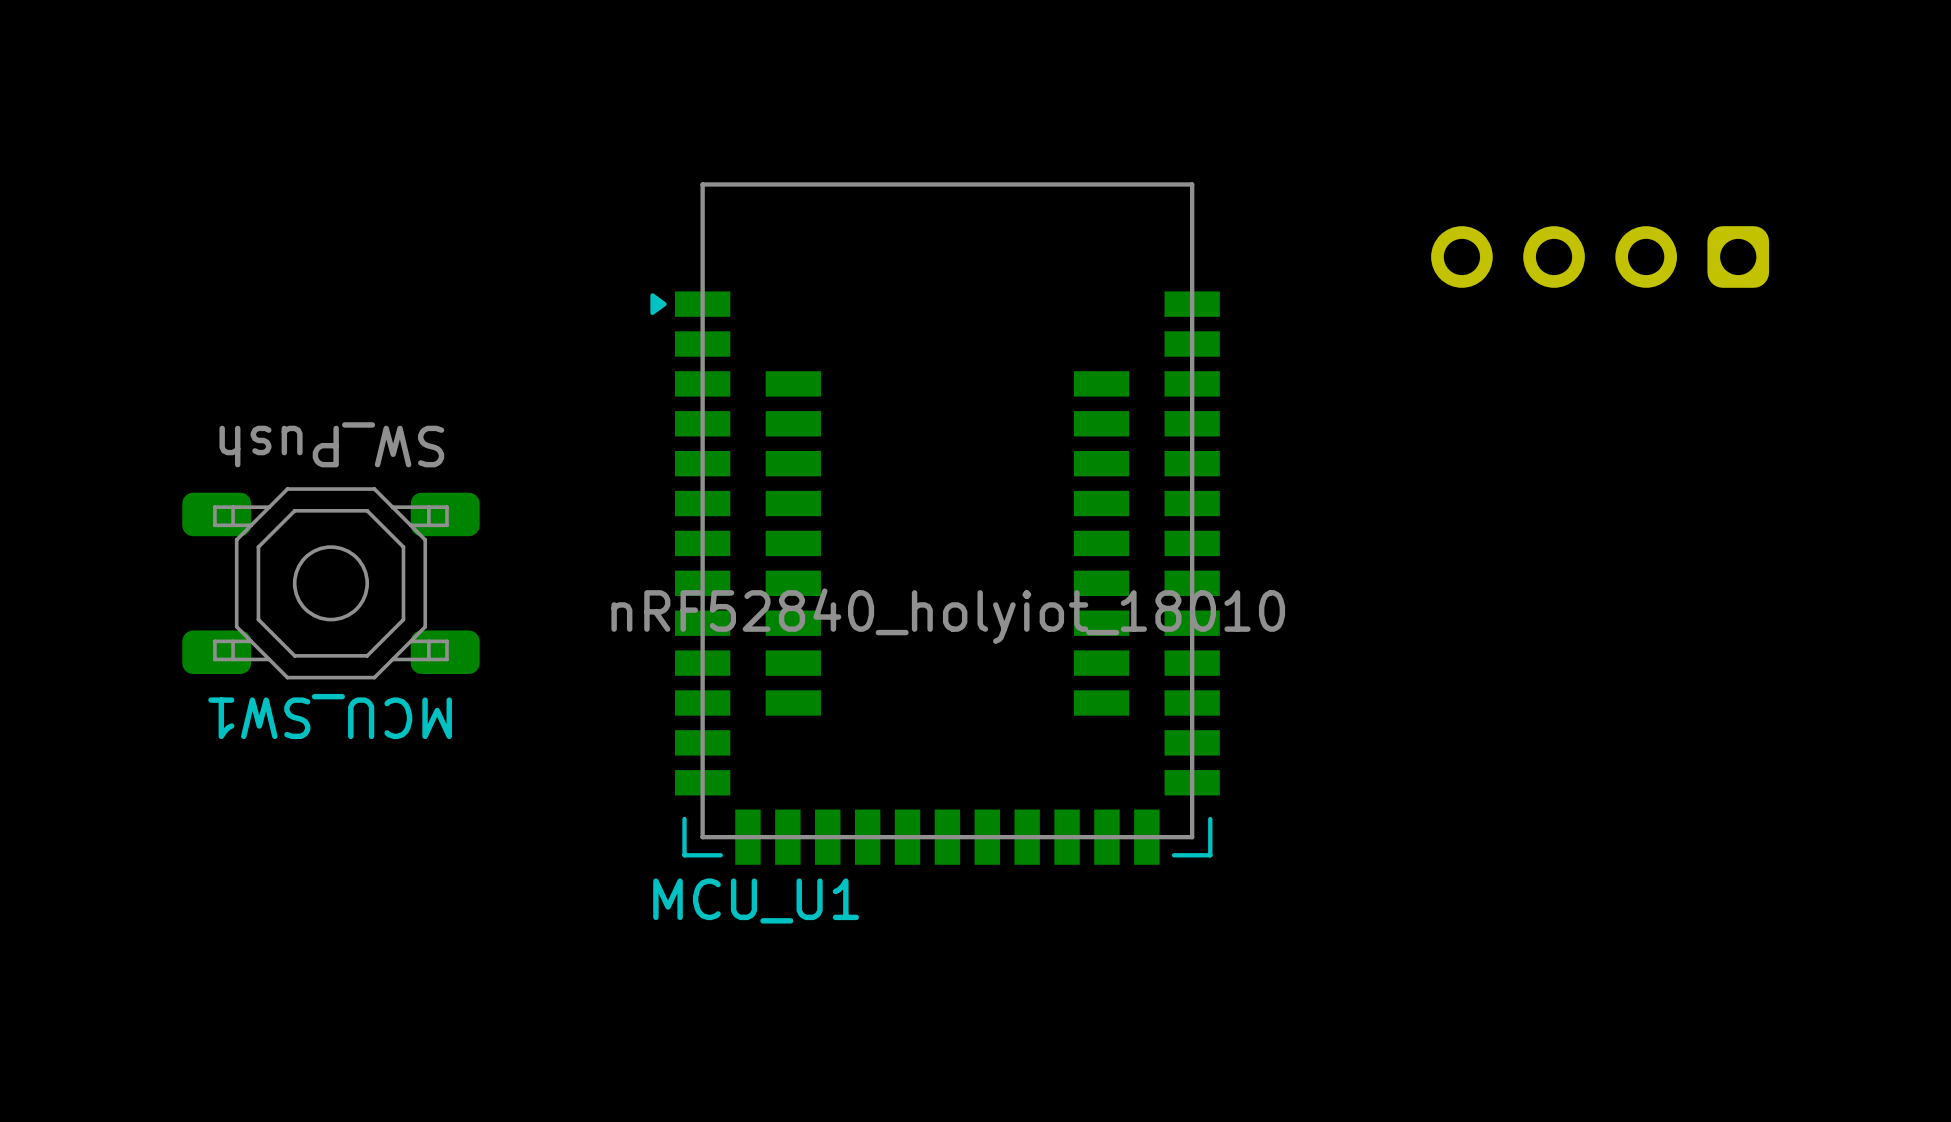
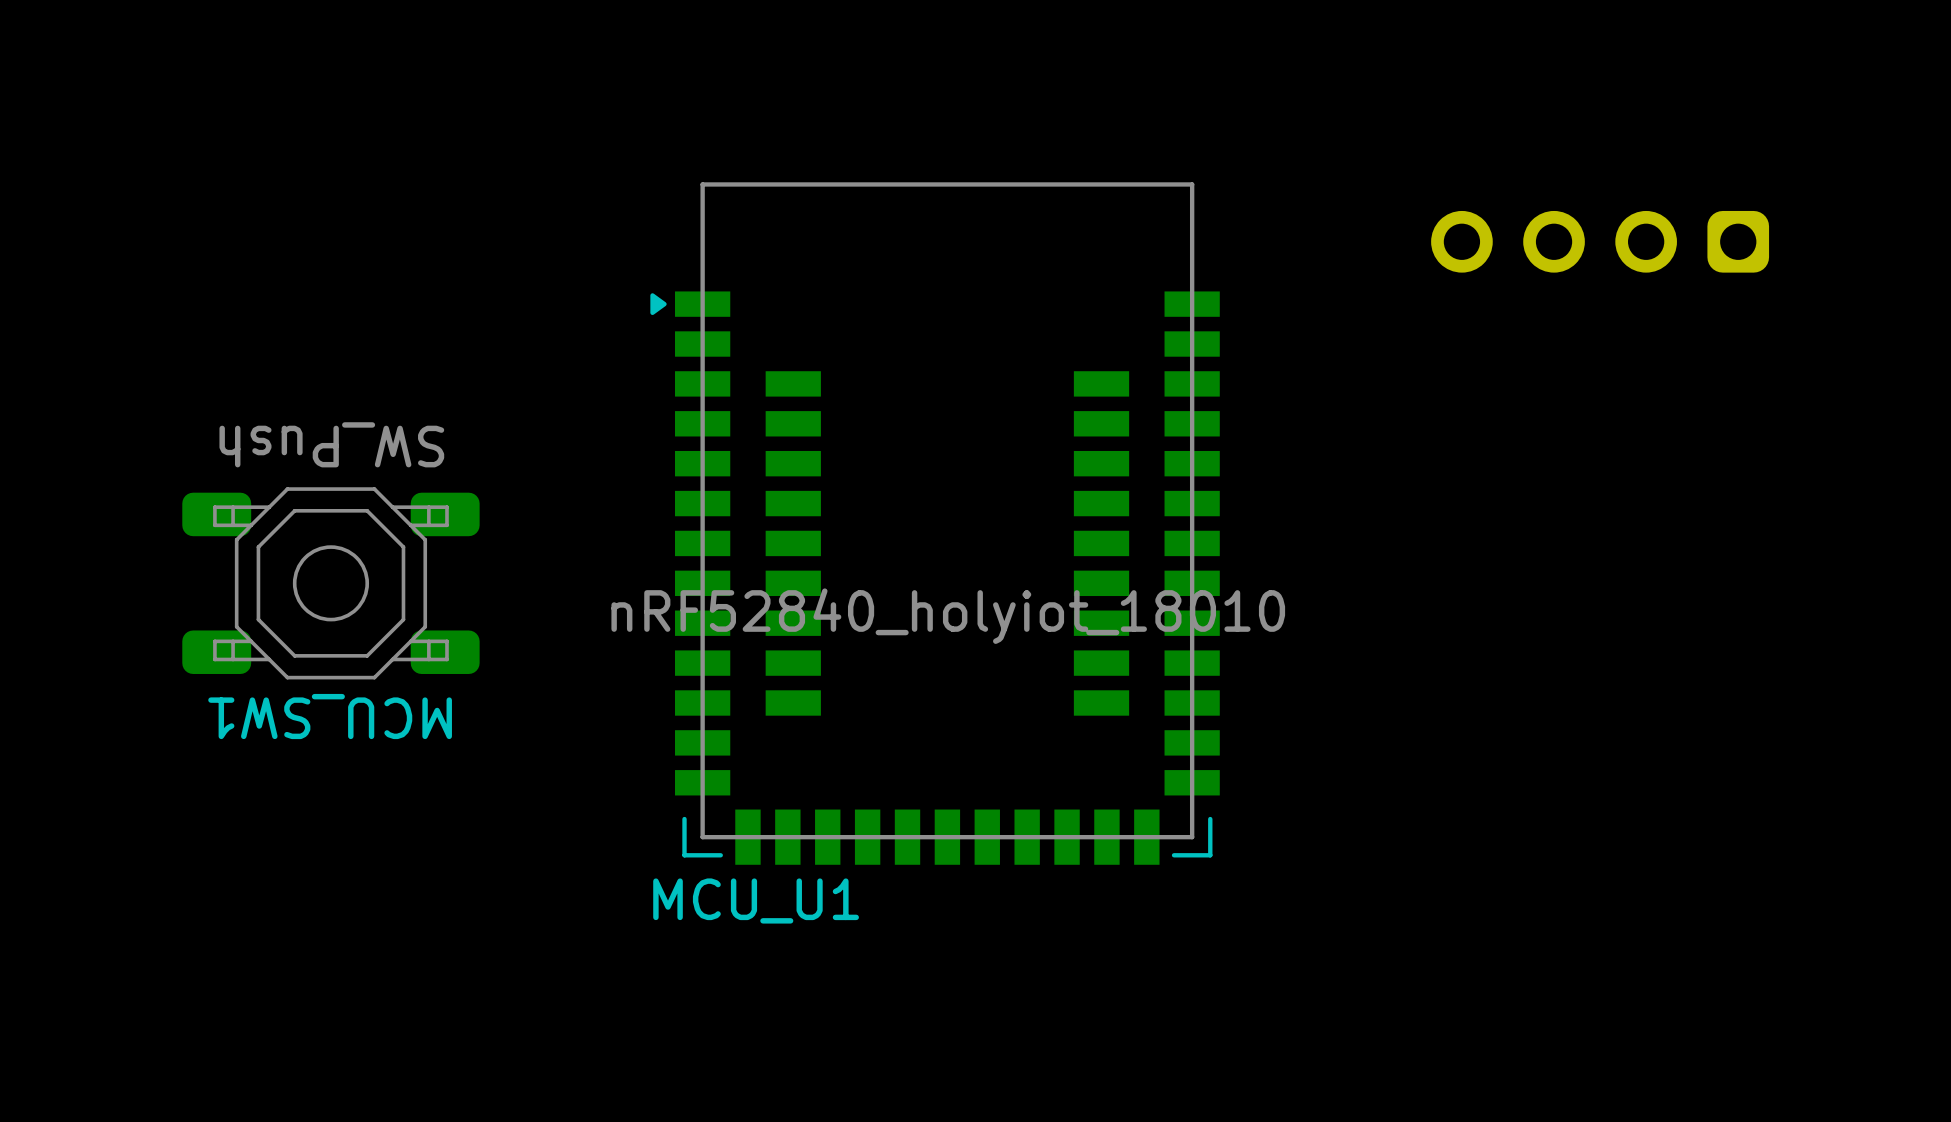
part position: (1600, 256) -> (1600, 241)

